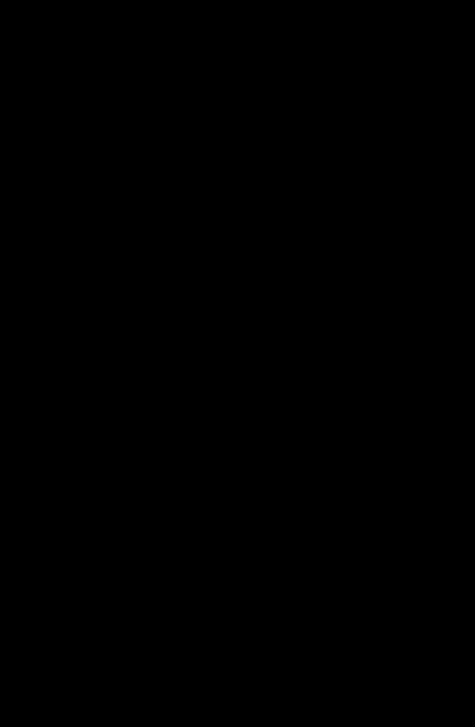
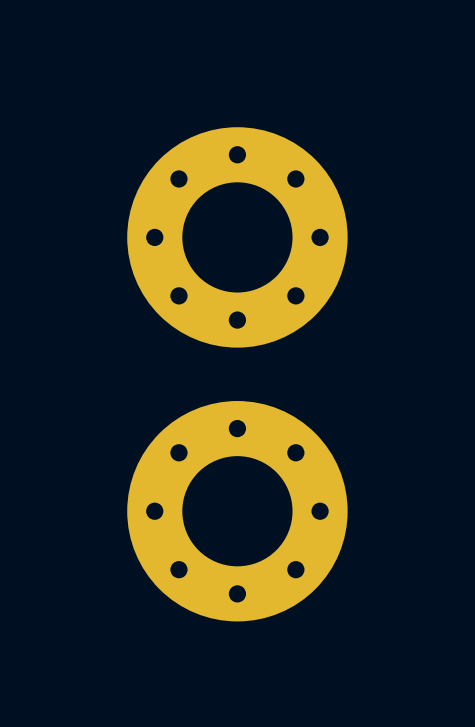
part: none -> (237, 237)
part: none -> (237, 511)

